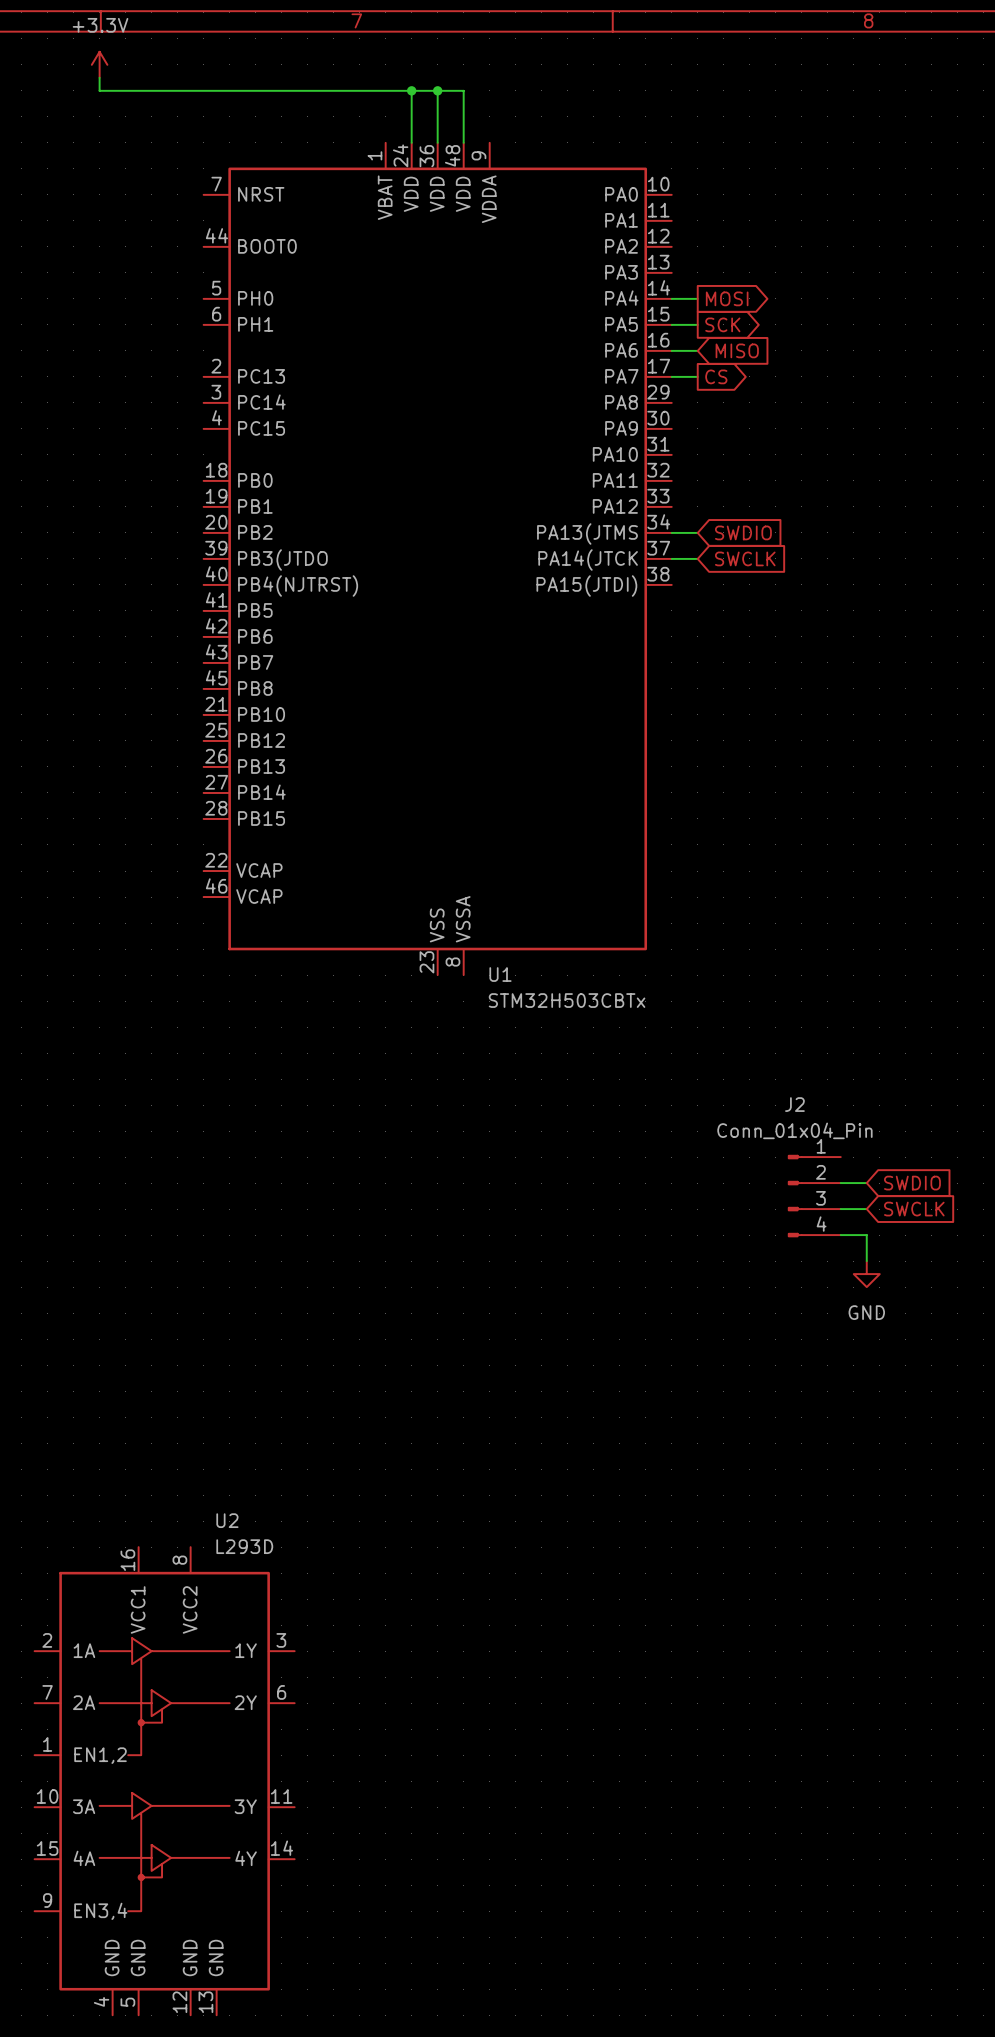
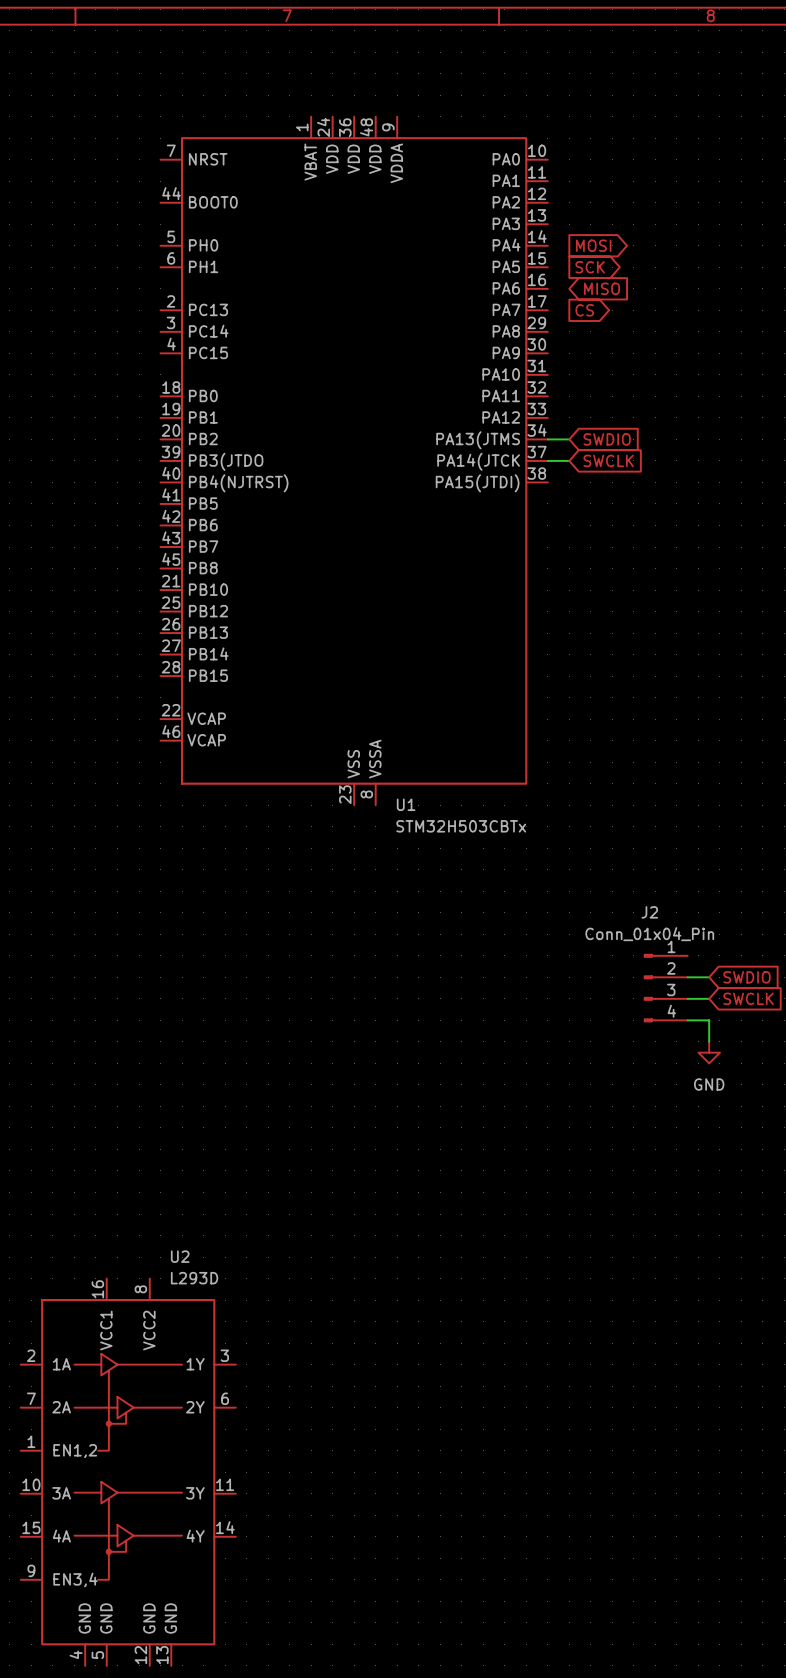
power symbol: +3.3V (99, 64) -> none
wire: (99, 77) (99, 90) (463, 90) (463, 142) -> none
wire: (411, 90) (411, 142) -> none
junction: (411, 90) -> none
wire: (437, 90) (437, 142) -> none
junction: (437, 90) -> none
wire: (671, 298) (697, 298) -> none
wire: (671, 324) (697, 324) -> none
wire: (671, 350) (697, 350) -> none
wire: (671, 376) (697, 376) -> none

